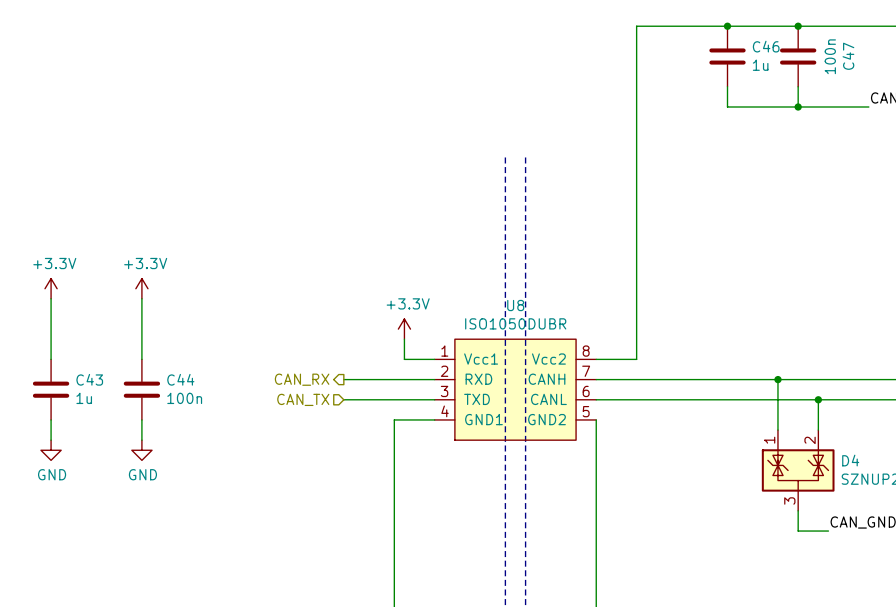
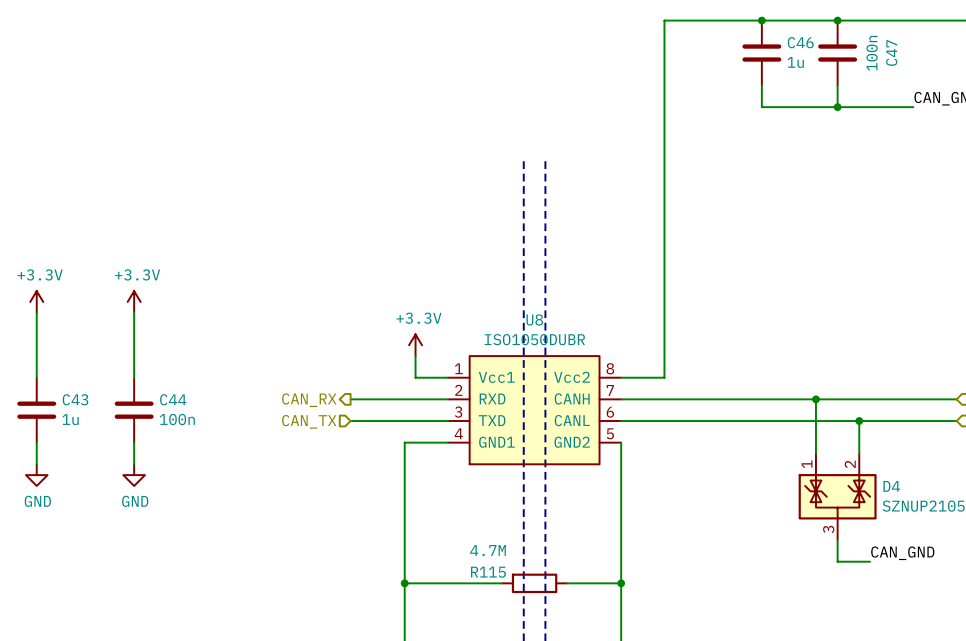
wire: none -> (404, 583) (502, 583)
junction: none -> (404, 583)
R115: none -> 4.7M (534, 583)
wire: none -> (567, 583) (621, 583)
junction: none -> (621, 583)

